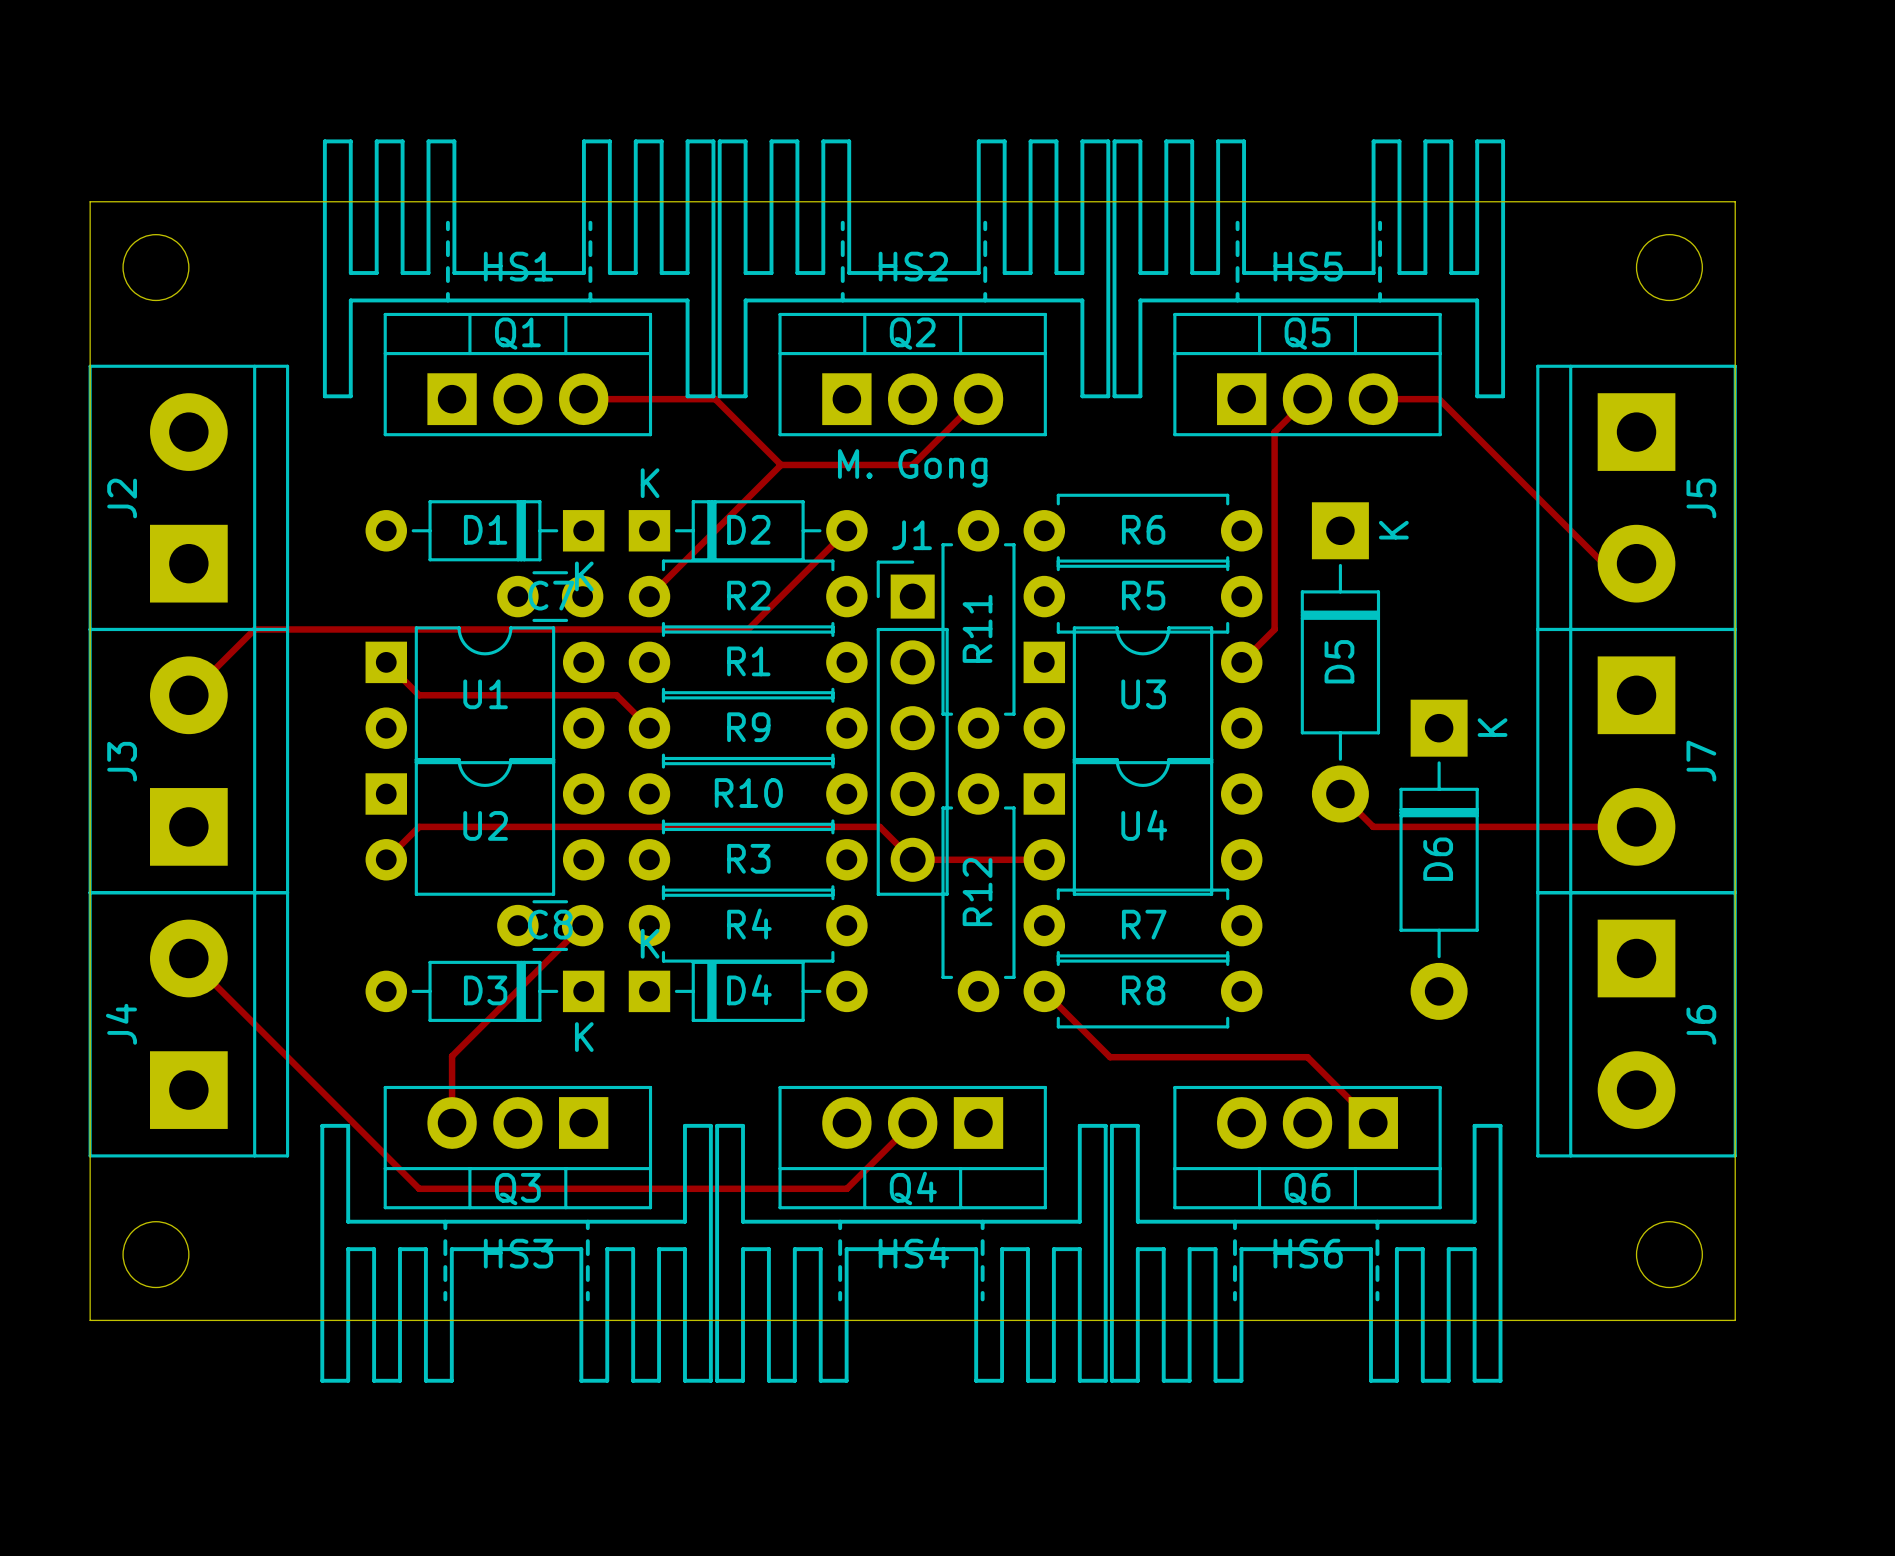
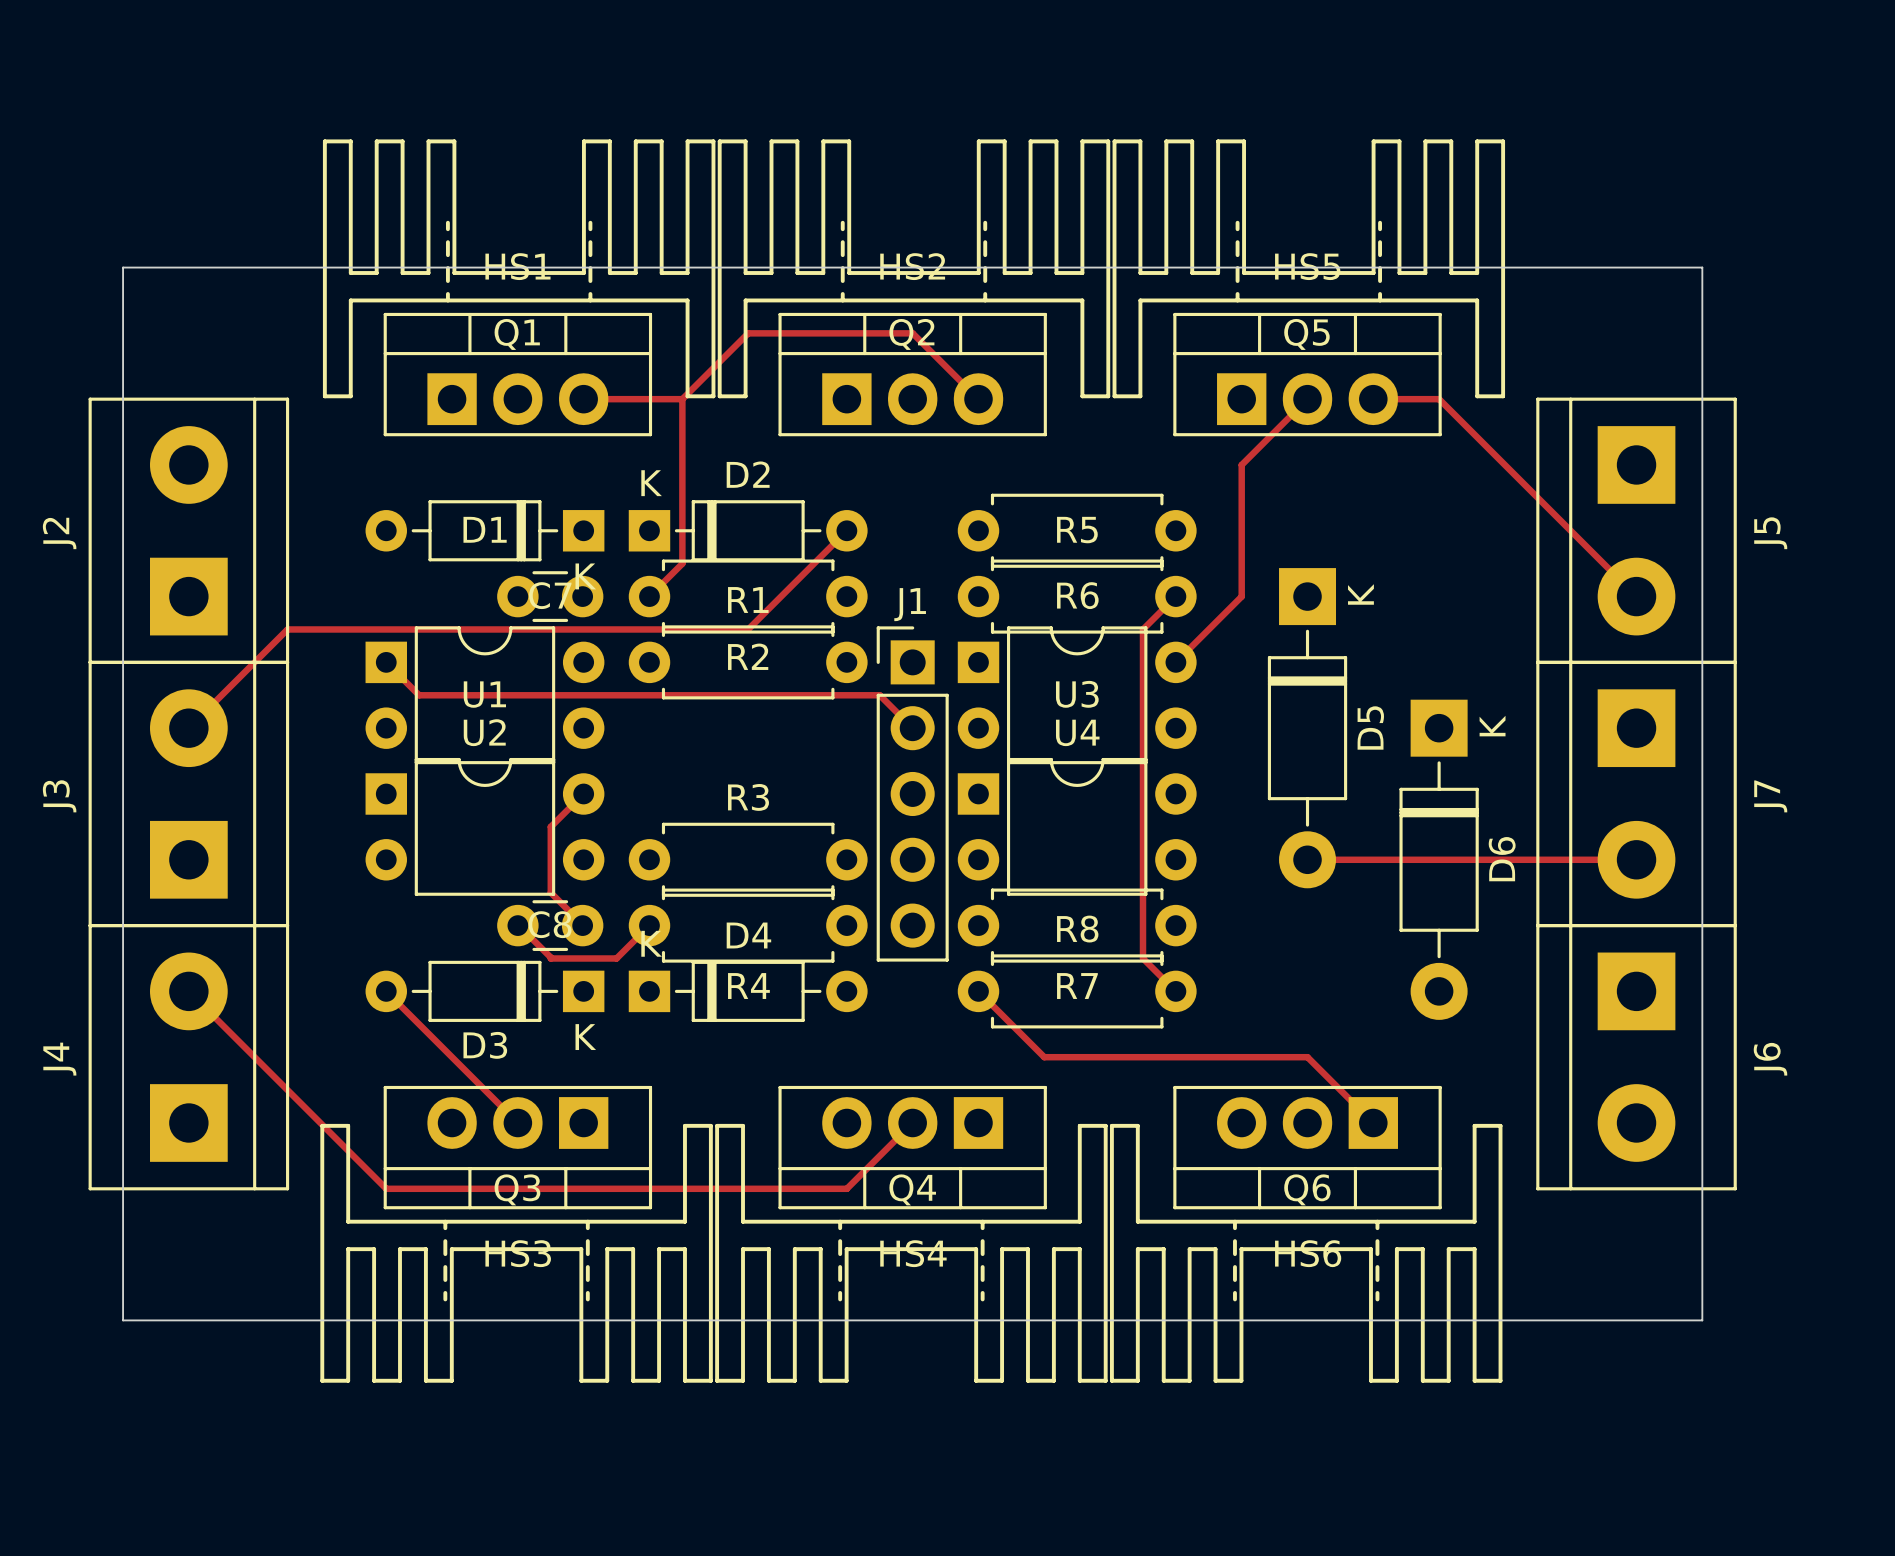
round board edge: [122, 234, 190, 302] -> none
round board edge: [1635, 234, 1703, 302] -> none
track: (682, 399) (715, 399) (781, 464) -> none
track: (978, 399) (912, 464) (781, 464) -> (978, 399) (912, 333) (748, 333) (682, 399) (682, 563)
track: (1274, 432) (1274, 629) (1241, 662) -> (1274, 432) (1241, 464) (1241, 596) (1175, 662)
track: (781, 464) (682, 563) -> none
text: M. Gong (912, 468) -> none
J2 position: (188, 497) -> (188, 530)
J5 position: (1636, 497) -> (1636, 530)
J2 name position: J2 (122, 498) -> J2 (59, 533)
J5 name position: J5 (1701, 498) -> J5 (1770, 533)
D2 name position: D2 (748, 529) -> D2 (748, 474)
R6 position: (1143, 530) -> (1077, 596)
R2 name position: R2 (748, 595) -> R2 (748, 656)
R5 position: (1143, 596) -> (1077, 530)
track: none -> (1175, 596) (1143, 629) (1143, 958) (1175, 991)
track: (287, 629) (254, 629) (188, 695) -> (287, 629) (188, 728)
R11: (978, 629) -> none
R1 name position: R1 (748, 661) -> R1 (748, 600)
D5 name position: D5 (1339, 661) -> D5 (1370, 727)
D5 position: (1340, 662) -> (1307, 728)
track: (616, 695) (649, 728) -> (616, 695) (879, 695) (912, 728)
U3 position: (1143, 695) -> (1077, 695)
R9: (748, 728) -> none
J1 position: (912, 728) -> (912, 793)
J3 name position: J3 (122, 761) -> J3 (59, 796)
J3 position: (188, 761) -> (188, 793)
J7 position: (1636, 761) -> (1636, 793)
J7 name position: J7 (1701, 761) -> J7 (1770, 796)
track: none -> (583, 793) (550, 826) (550, 892) (583, 925)
R10: (748, 793) -> none
track: (1340, 793) (1373, 826) (1636, 826) -> none
U2 name position: U2 (485, 825) -> U2 (484, 732)
U4 name position: U4 (1144, 825) -> U4 (1077, 732)
U4 position: (1143, 826) -> (1077, 826)
R3 name position: R3 (748, 858) -> R3 (748, 797)
track: (386, 859) (419, 826) (879, 826) (912, 859) (1044, 859) -> none
track: none -> (1307, 859) (1636, 859)
D6 name position: D6 (1438, 859) -> D6 (1502, 859)
R12: (978, 892) -> none
R4 name position: R4 (749, 924) -> R4 (748, 986)
R7 name position: R7 (1144, 924) -> R7 (1077, 986)
track: none -> (518, 925) (550, 958) (616, 958) (649, 925)
track: (582, 925) (452, 1056) (452, 1123) -> none
R7 position: (1143, 925) -> (1077, 925)
track: (188, 958) (419, 1188) -> (188, 991) (386, 1188) (419, 1188)
D4 name position: D4 (749, 989) -> D4 (748, 935)
D3 name position: D3 (485, 990) -> D3 (485, 1045)
R8 name position: R8 (1143, 990) -> R8 (1077, 929)
track: none -> (386, 991) (517, 1123)
track: (1044, 991) (1110, 1057) -> (978, 991) (1044, 1057) (1110, 1057)
R8 position: (1143, 991) -> (1077, 991)
J4 name position: J4 (121, 1024) -> J4 (59, 1059)
J4 position: (188, 1024) -> (188, 1057)
J6 position: (1636, 1024) -> (1636, 1057)
J6 name position: J6 (1701, 1024) -> J6 (1770, 1059)
round board edge: [122, 1221, 190, 1289] -> none
round board edge: [1635, 1221, 1703, 1289] -> none
board edge: (123, 1320) (90, 1320) (90, 201) (1735, 201) (1735, 1320) (1702, 1320) -> (123, 1320) (123, 267) (1702, 267) (1702, 1320)

